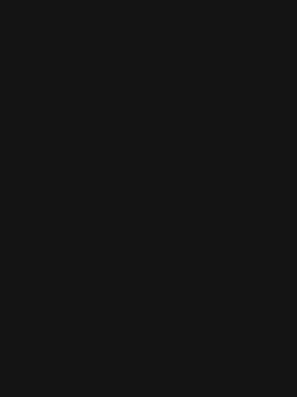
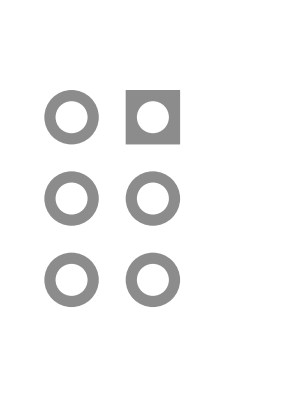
part: none -> (112, 198)

